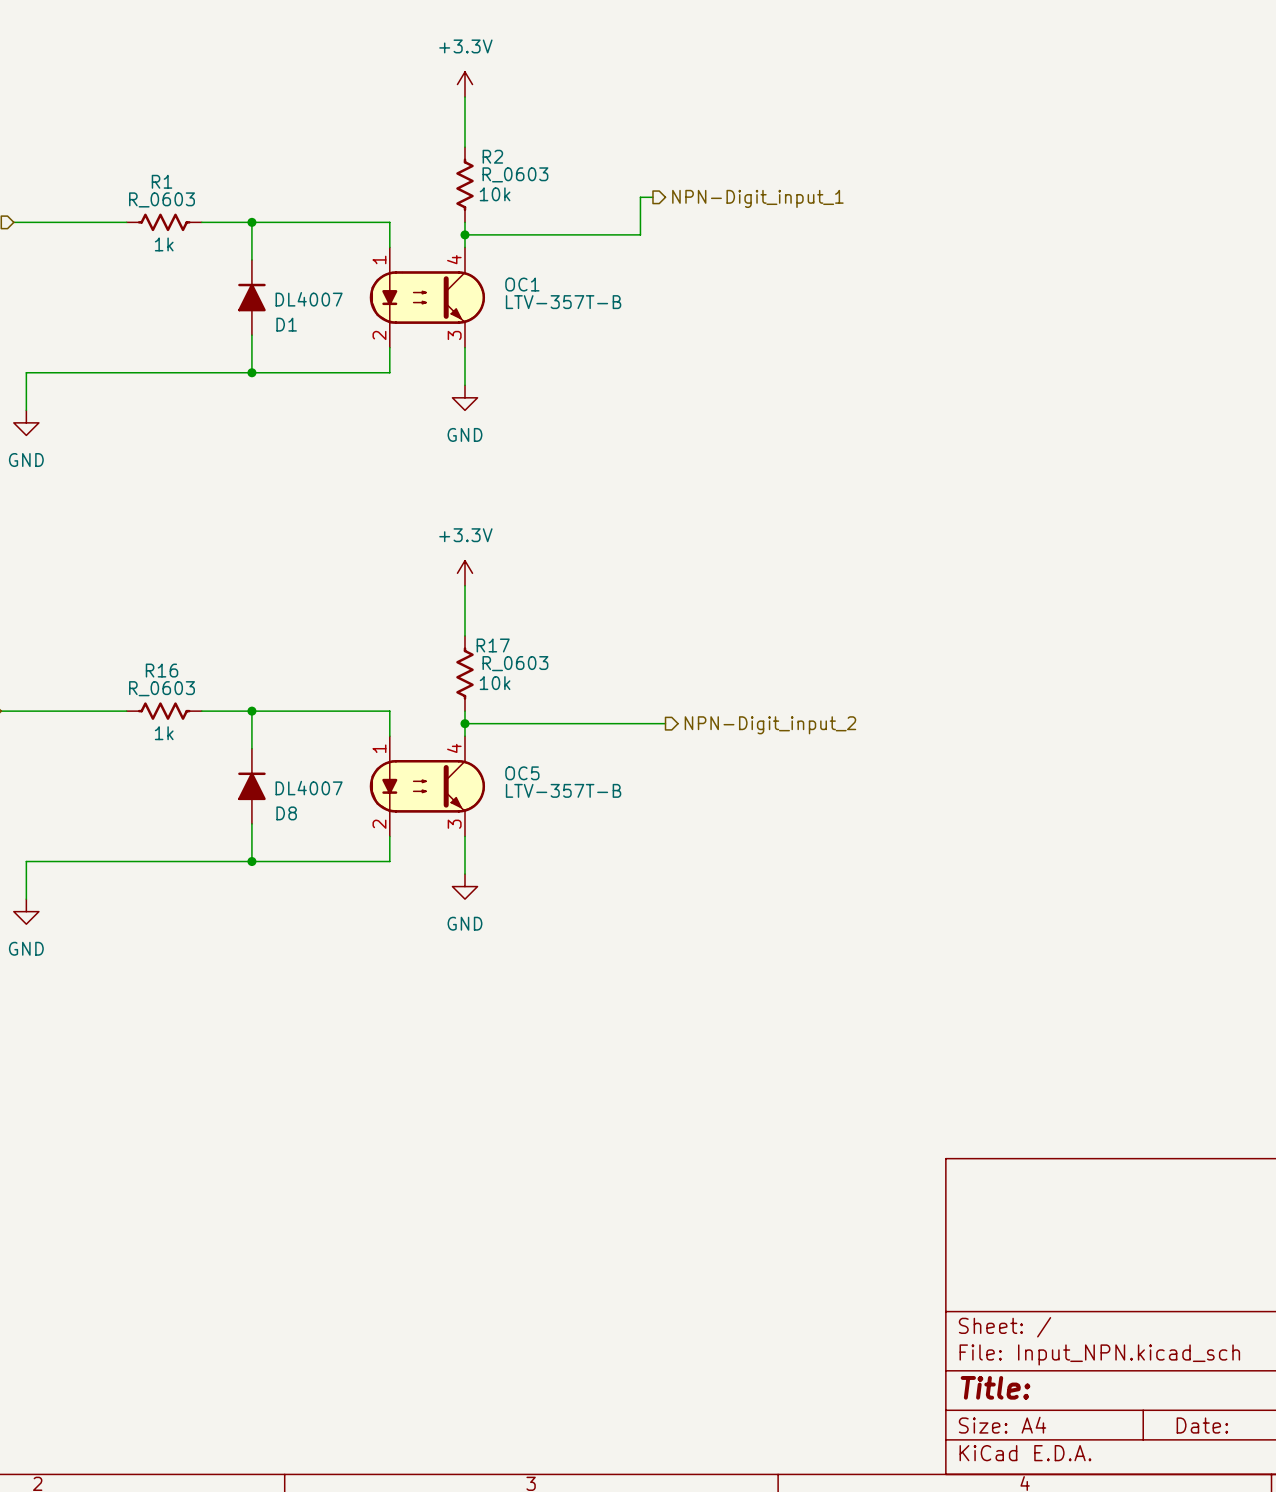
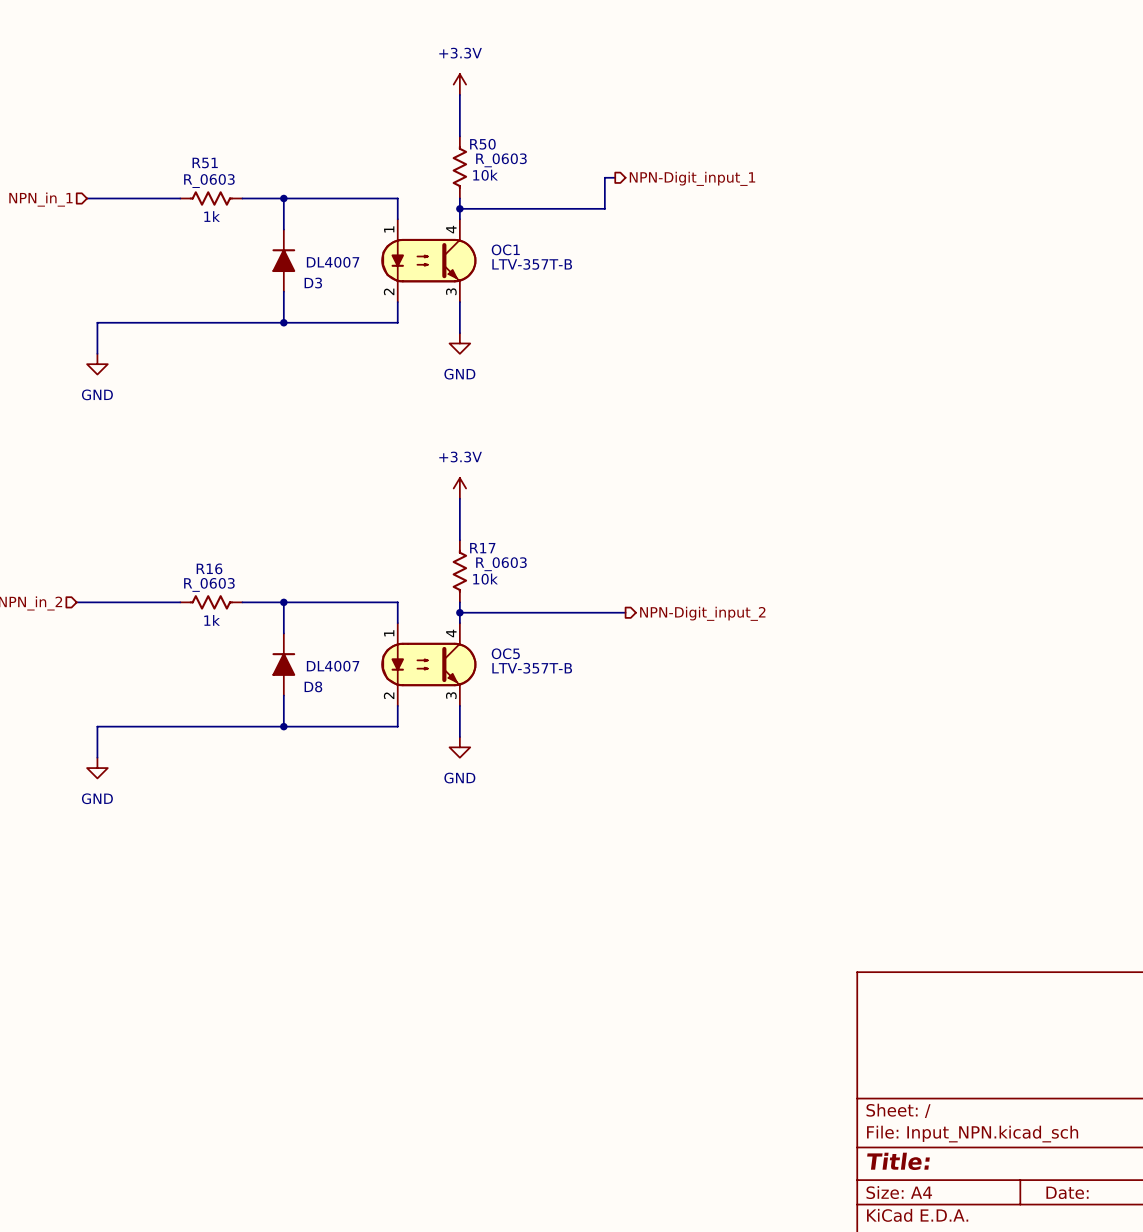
R2 name: R2 (492, 156) -> R50 (482, 144)
R1 name: R1 (162, 181) -> R51 (205, 162)
D1 name: D1 (286, 324) -> D3 (313, 283)

